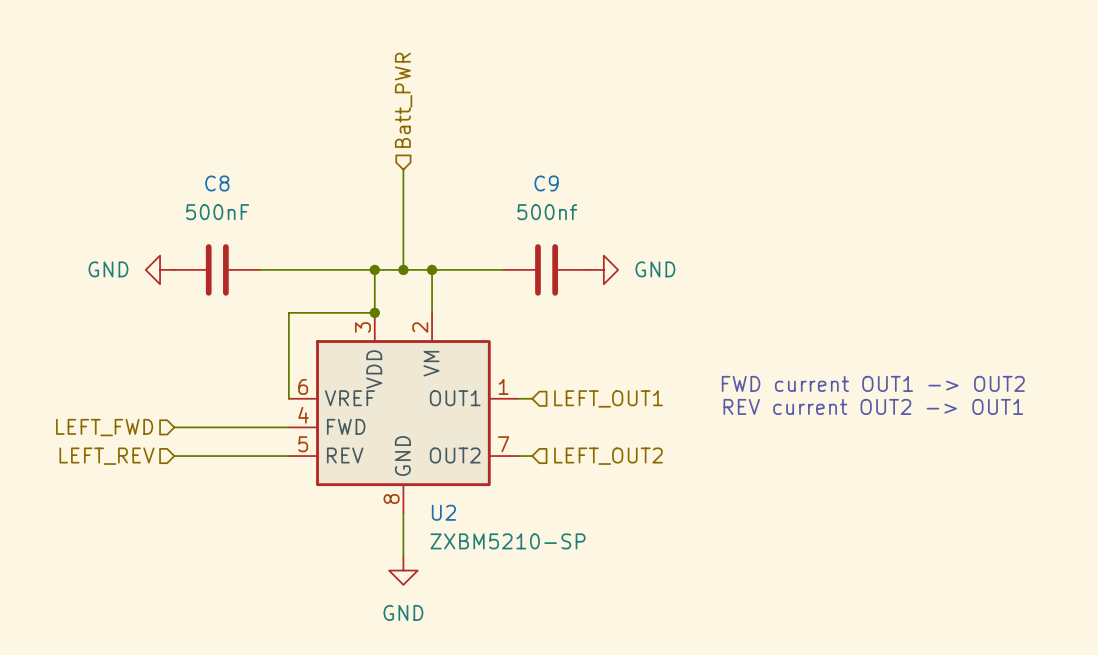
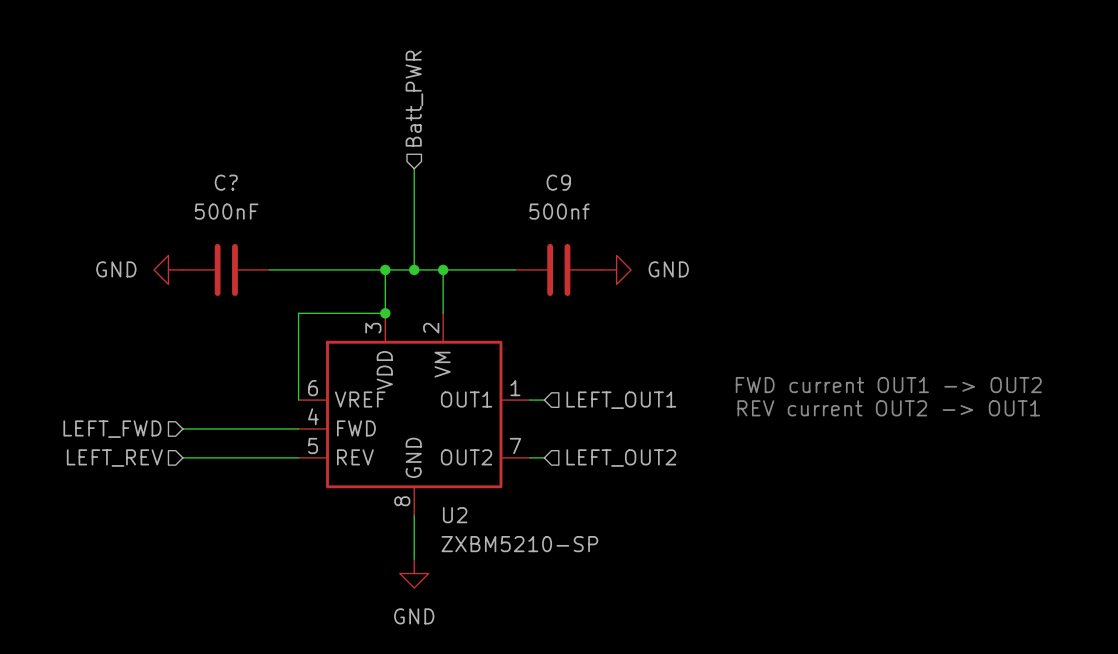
C8 name: C8 (217, 183) -> C? (226, 182)

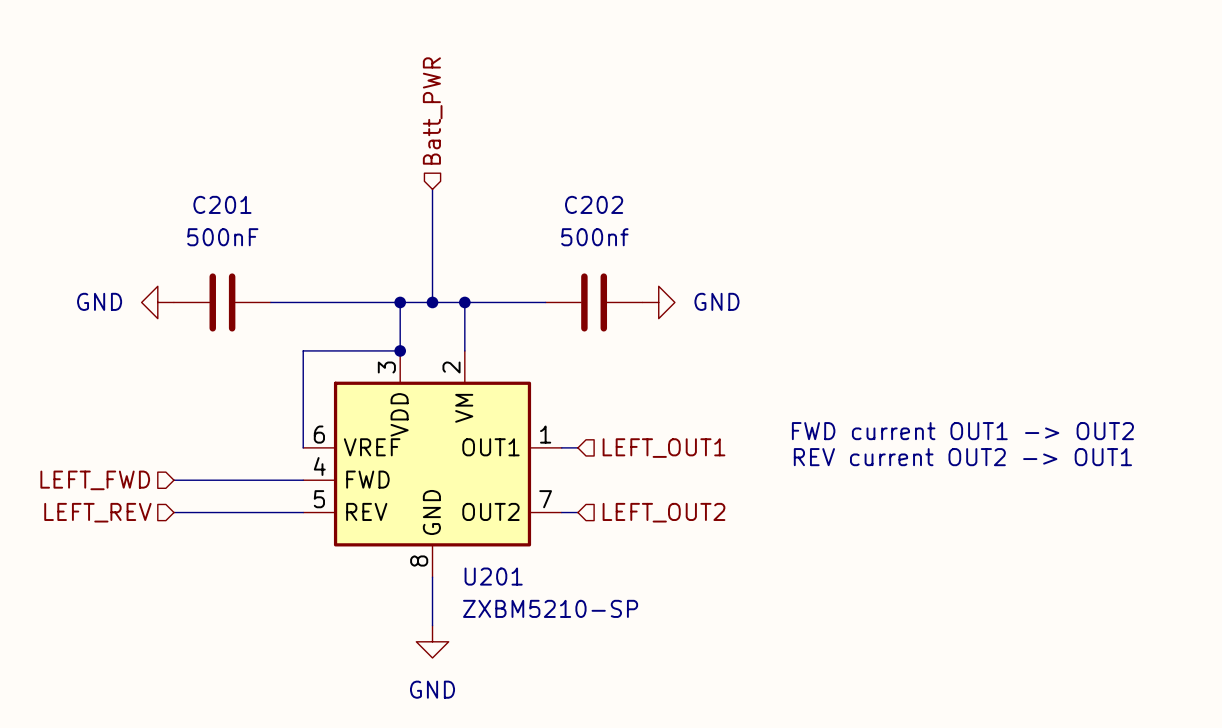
C? name: C? (226, 182) -> C201 (222, 204)
C9 name: C9 (558, 182) -> C202 (594, 204)
U2 name: U2 (455, 515) -> U201 (493, 576)

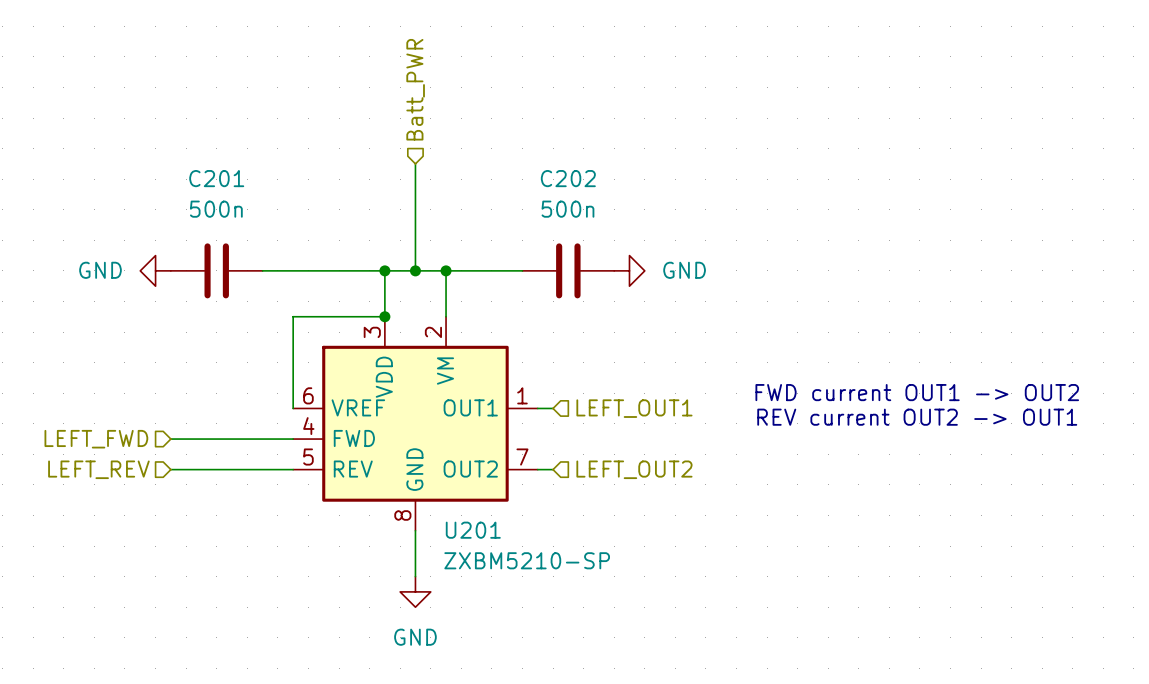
C201 value: 500nF (222, 237) -> 500n (216, 209)
C202 value: 500nf (594, 237) -> 500n (567, 209)

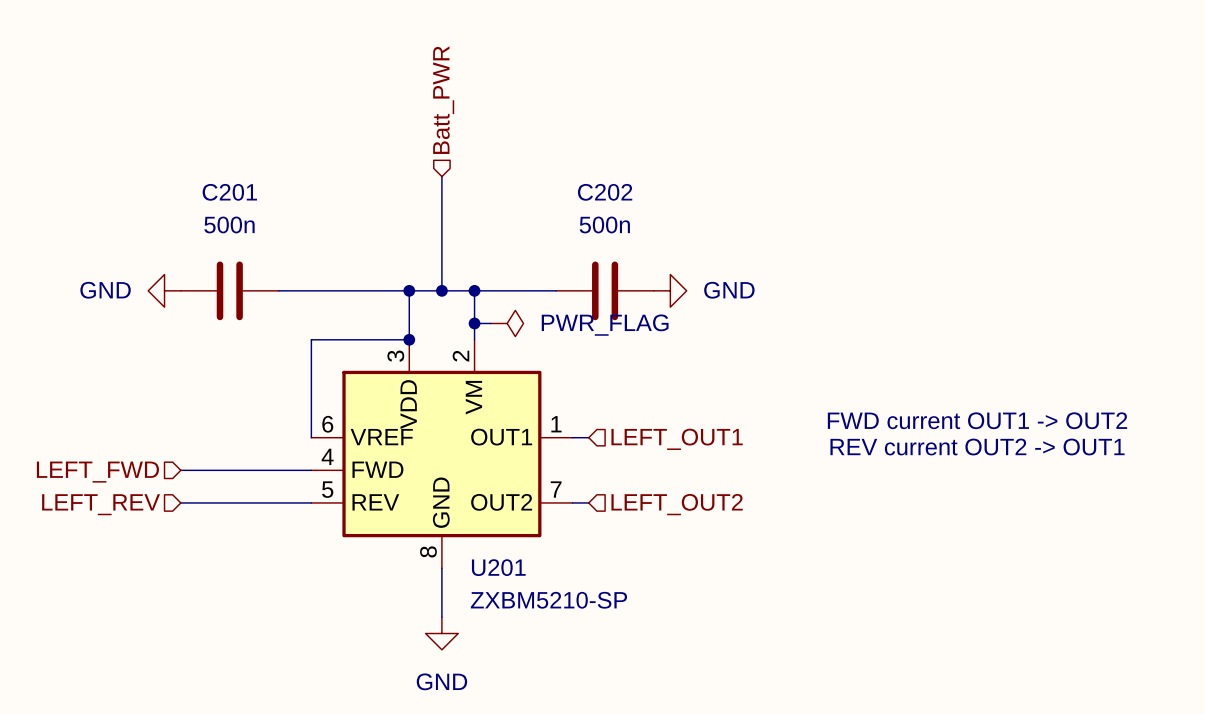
wire: none -> (474, 323) (490, 323)
junction: none -> (474, 323)
power symbol: none -> PWR_FLAG (507, 323)

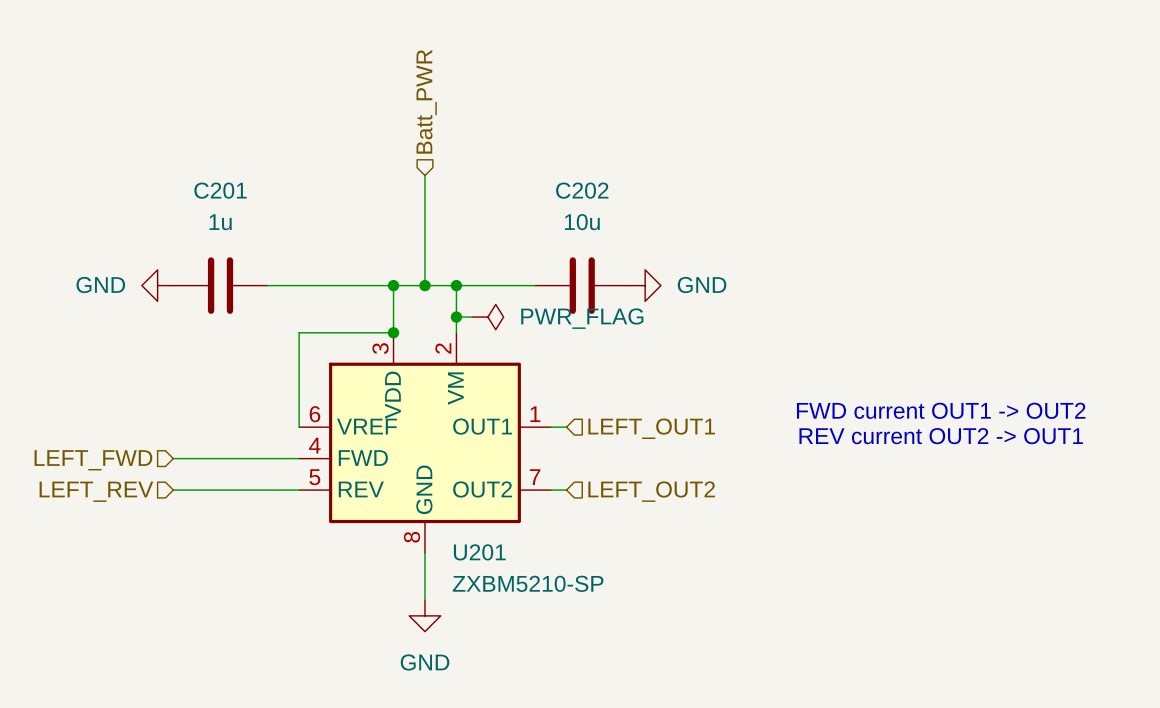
C201 value: 500n (229, 224) -> 1u (220, 222)
C202 value: 500n (604, 224) -> 10u (582, 222)

